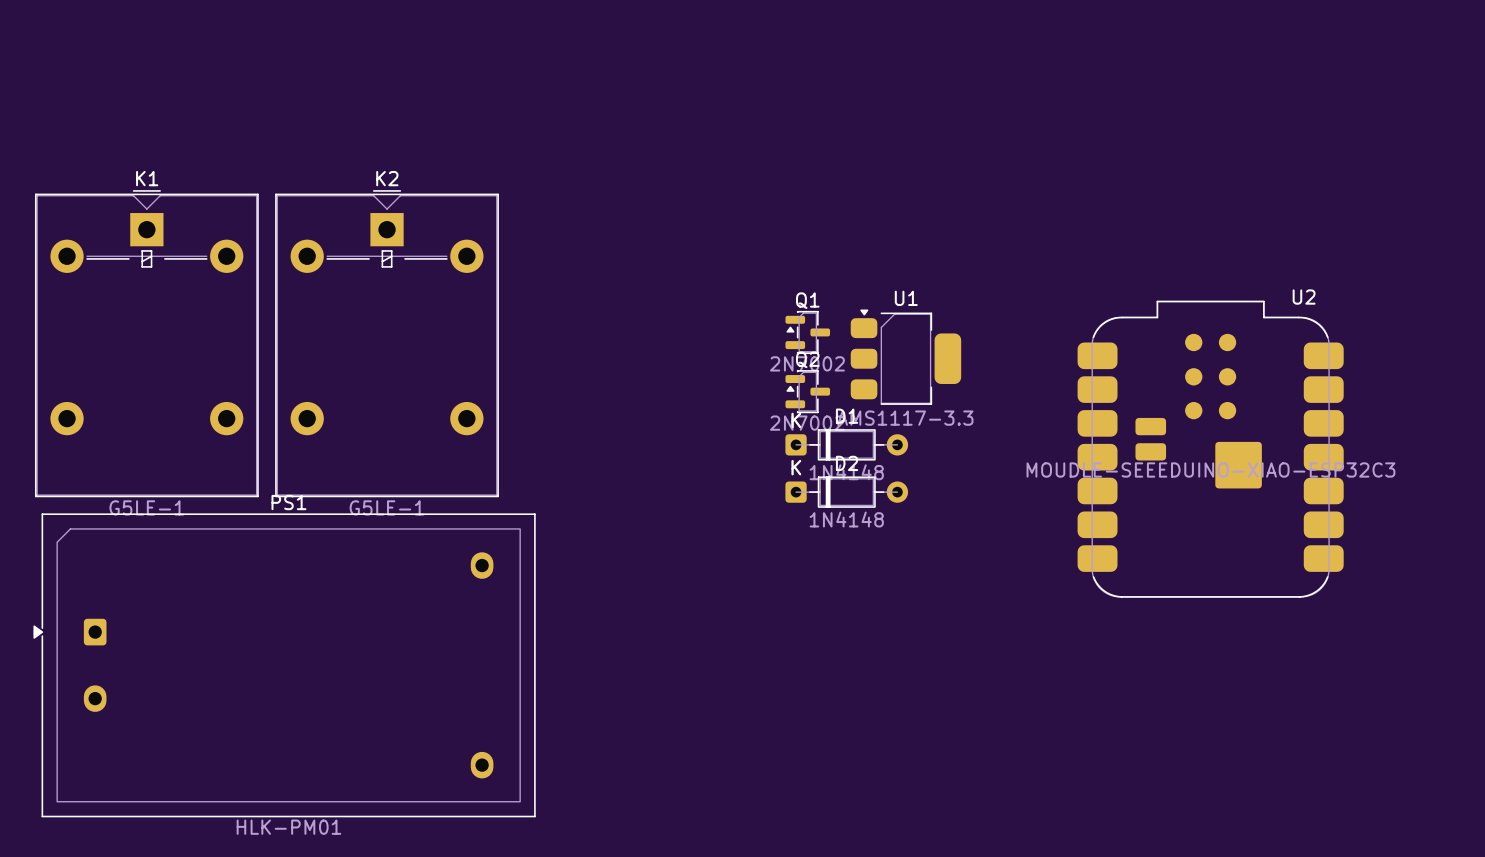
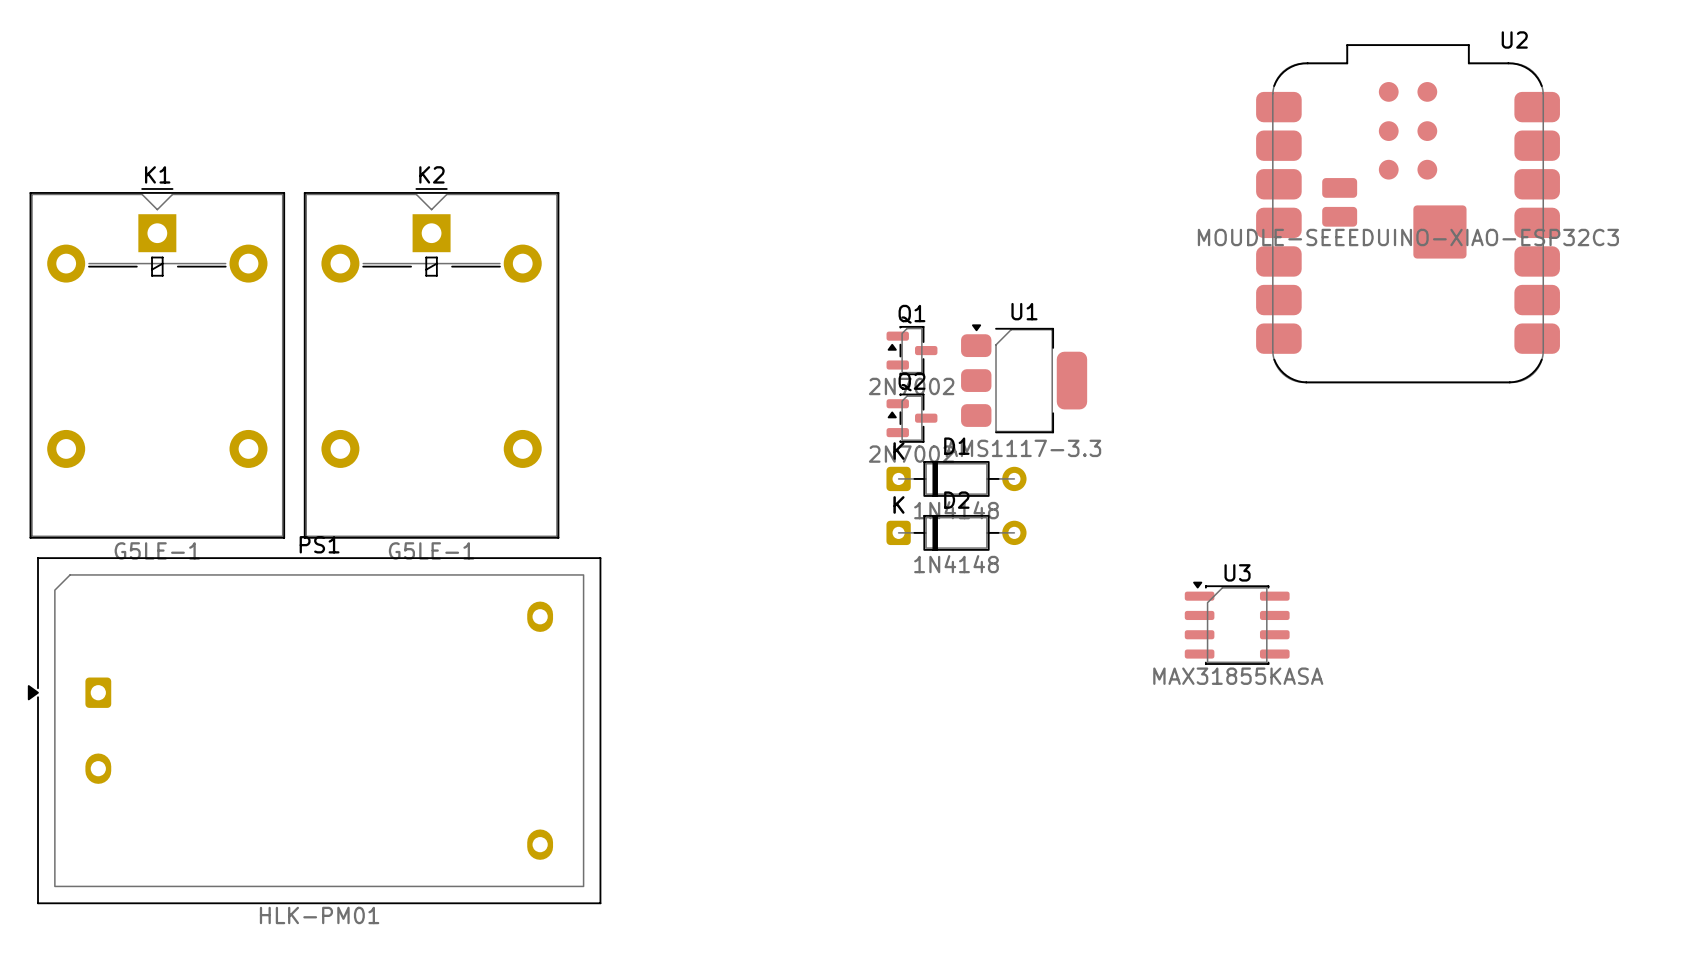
U2 position: (1210, 449) -> (1408, 213)
U3: none -> MAX31855KASA (1237, 623)

